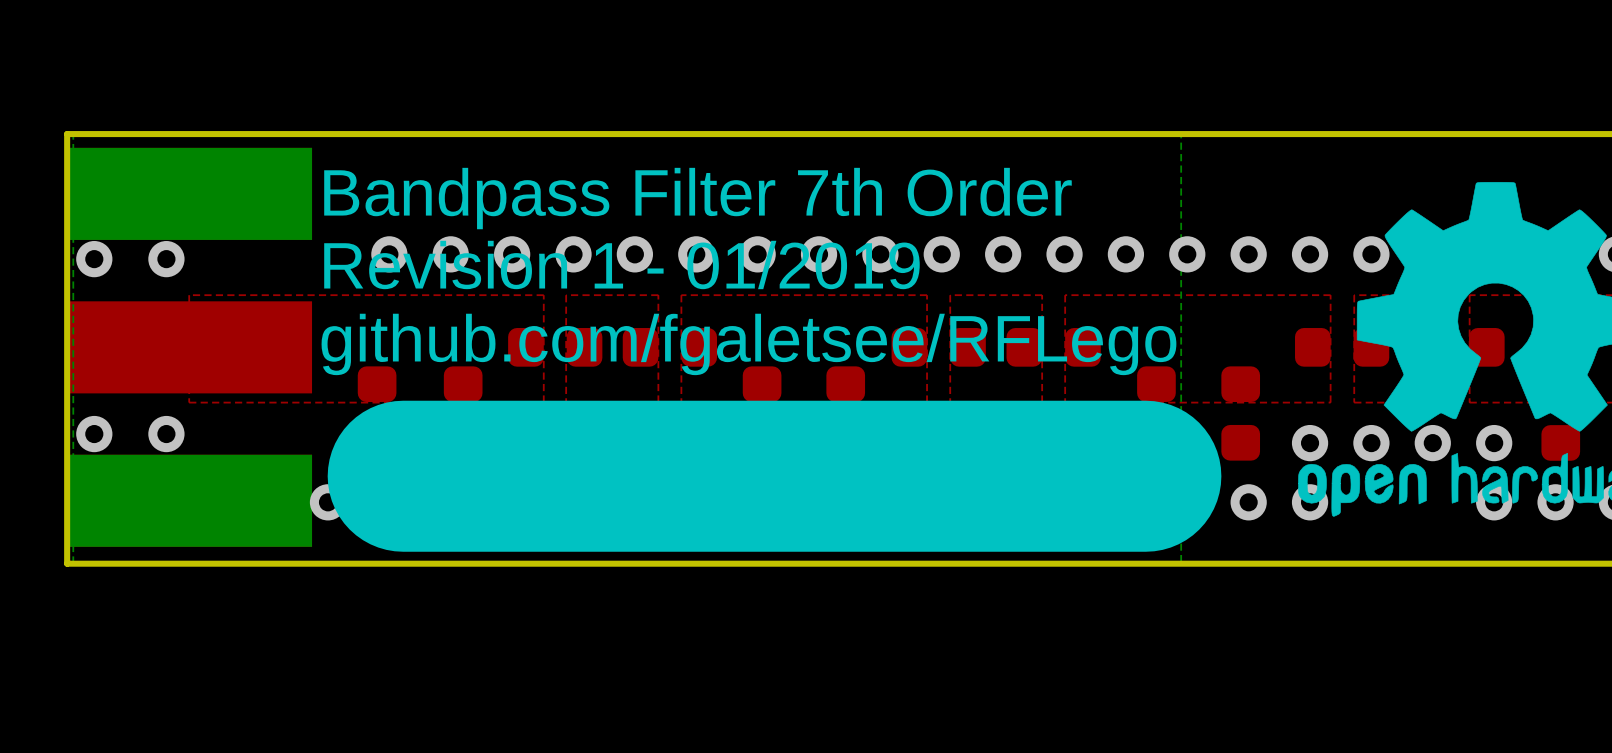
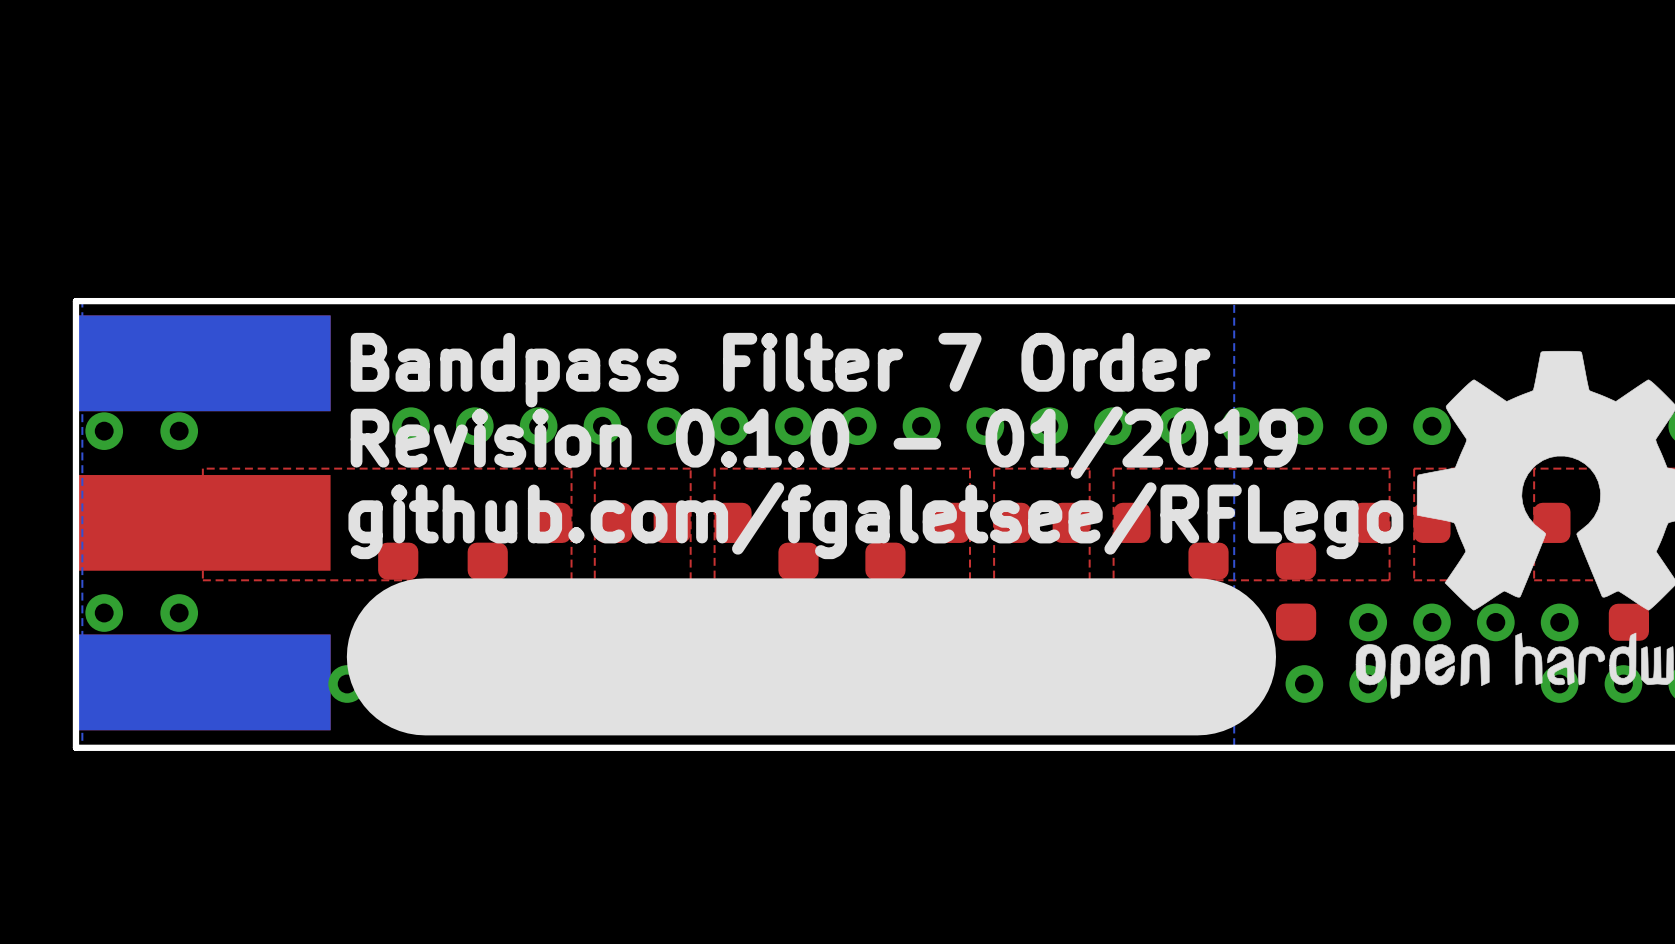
text: Bandpass Filter 7th Order (697, 198) -> Bandpass Filter 7 Order (780, 370)
text: Revision 1 - 01/2019 (621, 264) -> Revision 0.1.0 - 01/2019 (824, 442)

